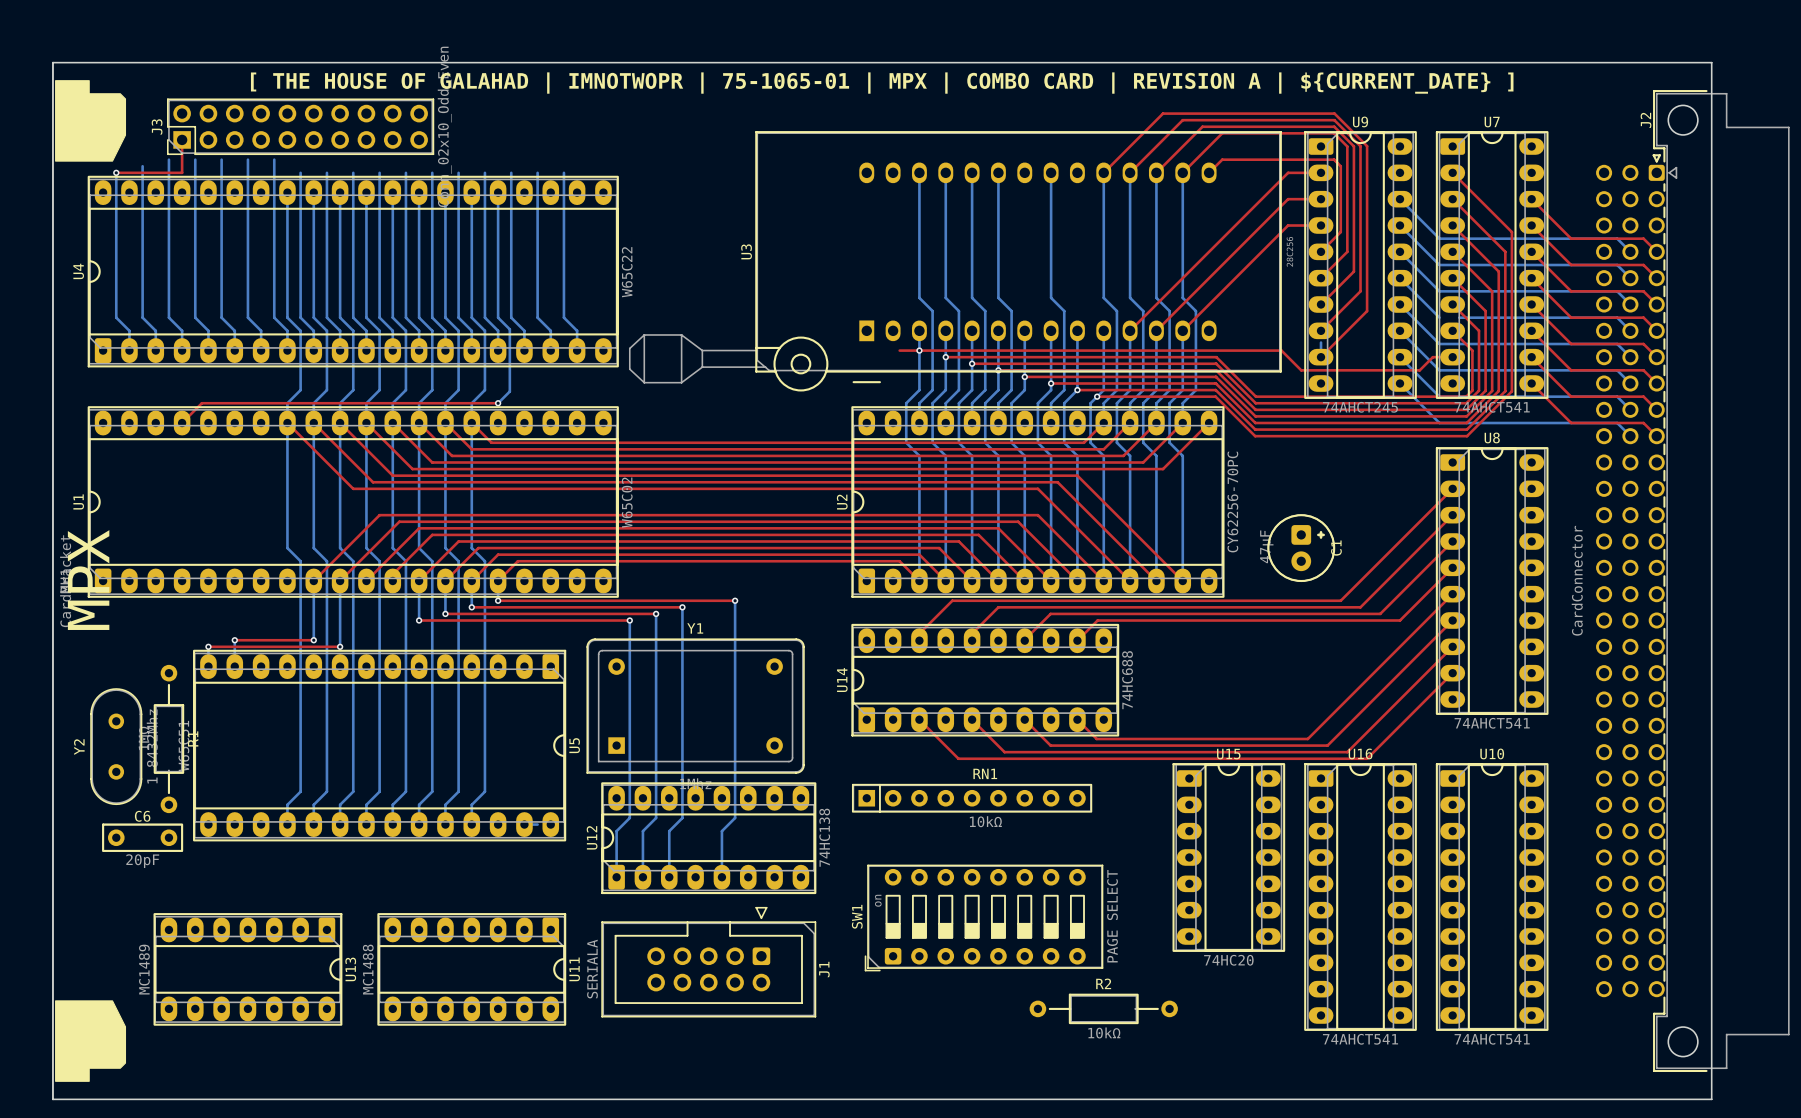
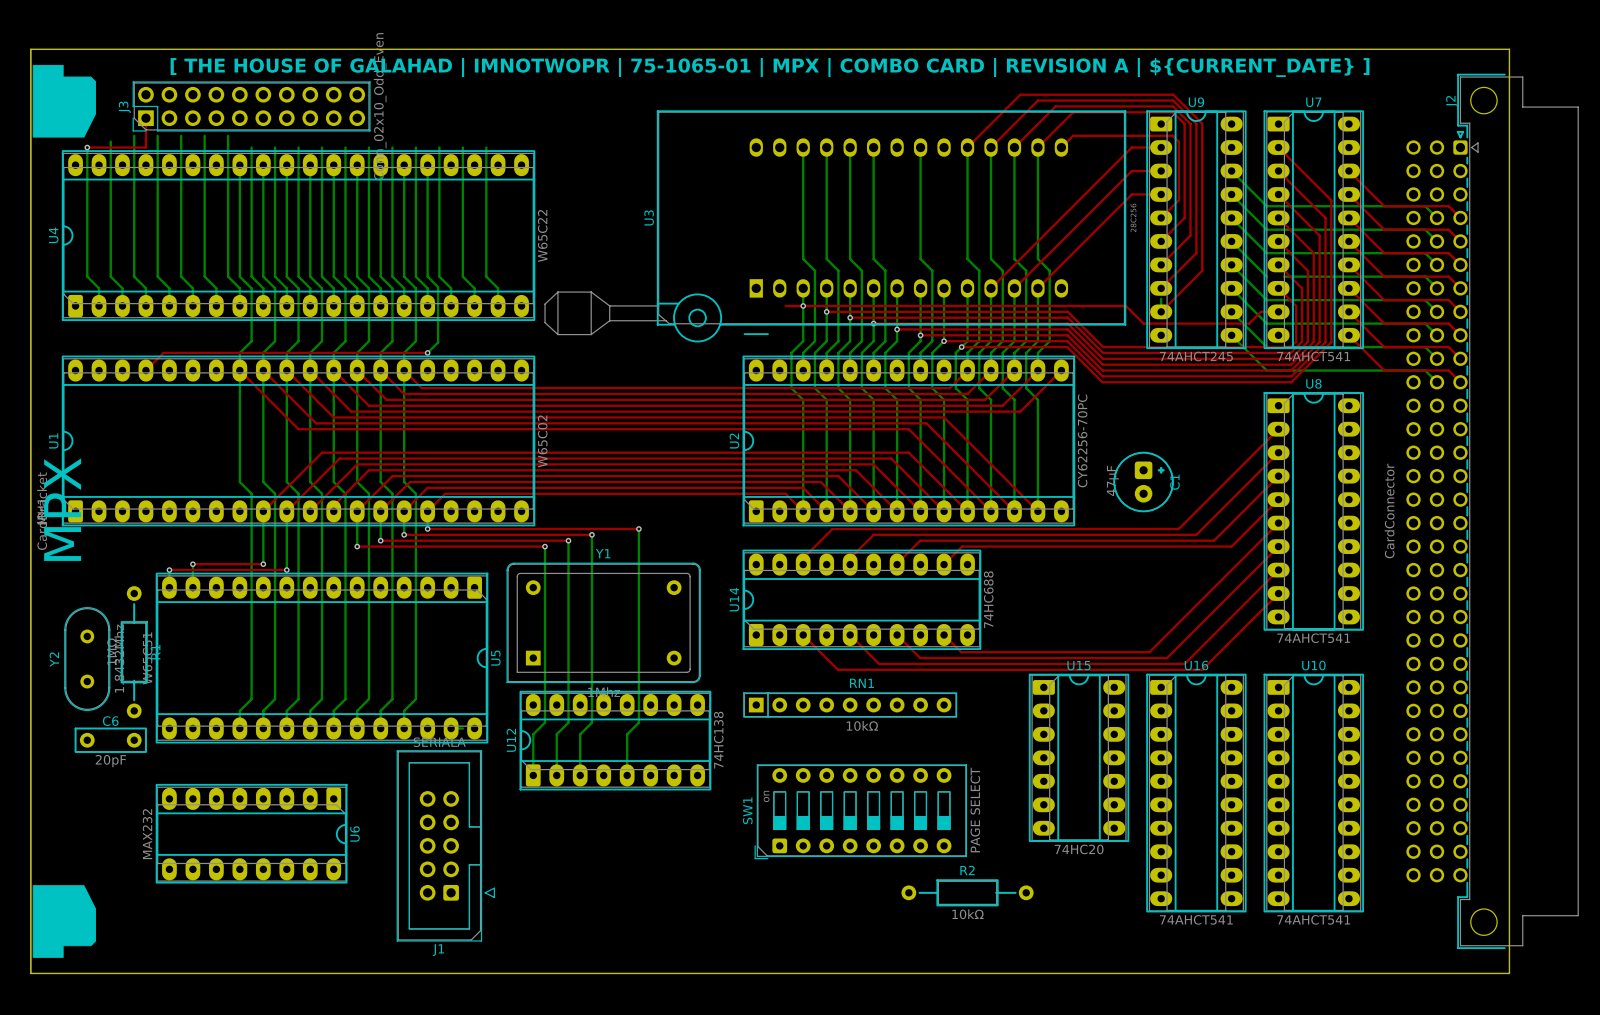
U6: none -> MAX232 (251, 833)
J1 rotation: 0° (708, 962) -> 90° clockwise (445, 845)
J1 position: (708, 962) -> (445, 845)
U13: MC1489 (247, 969) -> none
U11: MC1488 (471, 969) -> none

